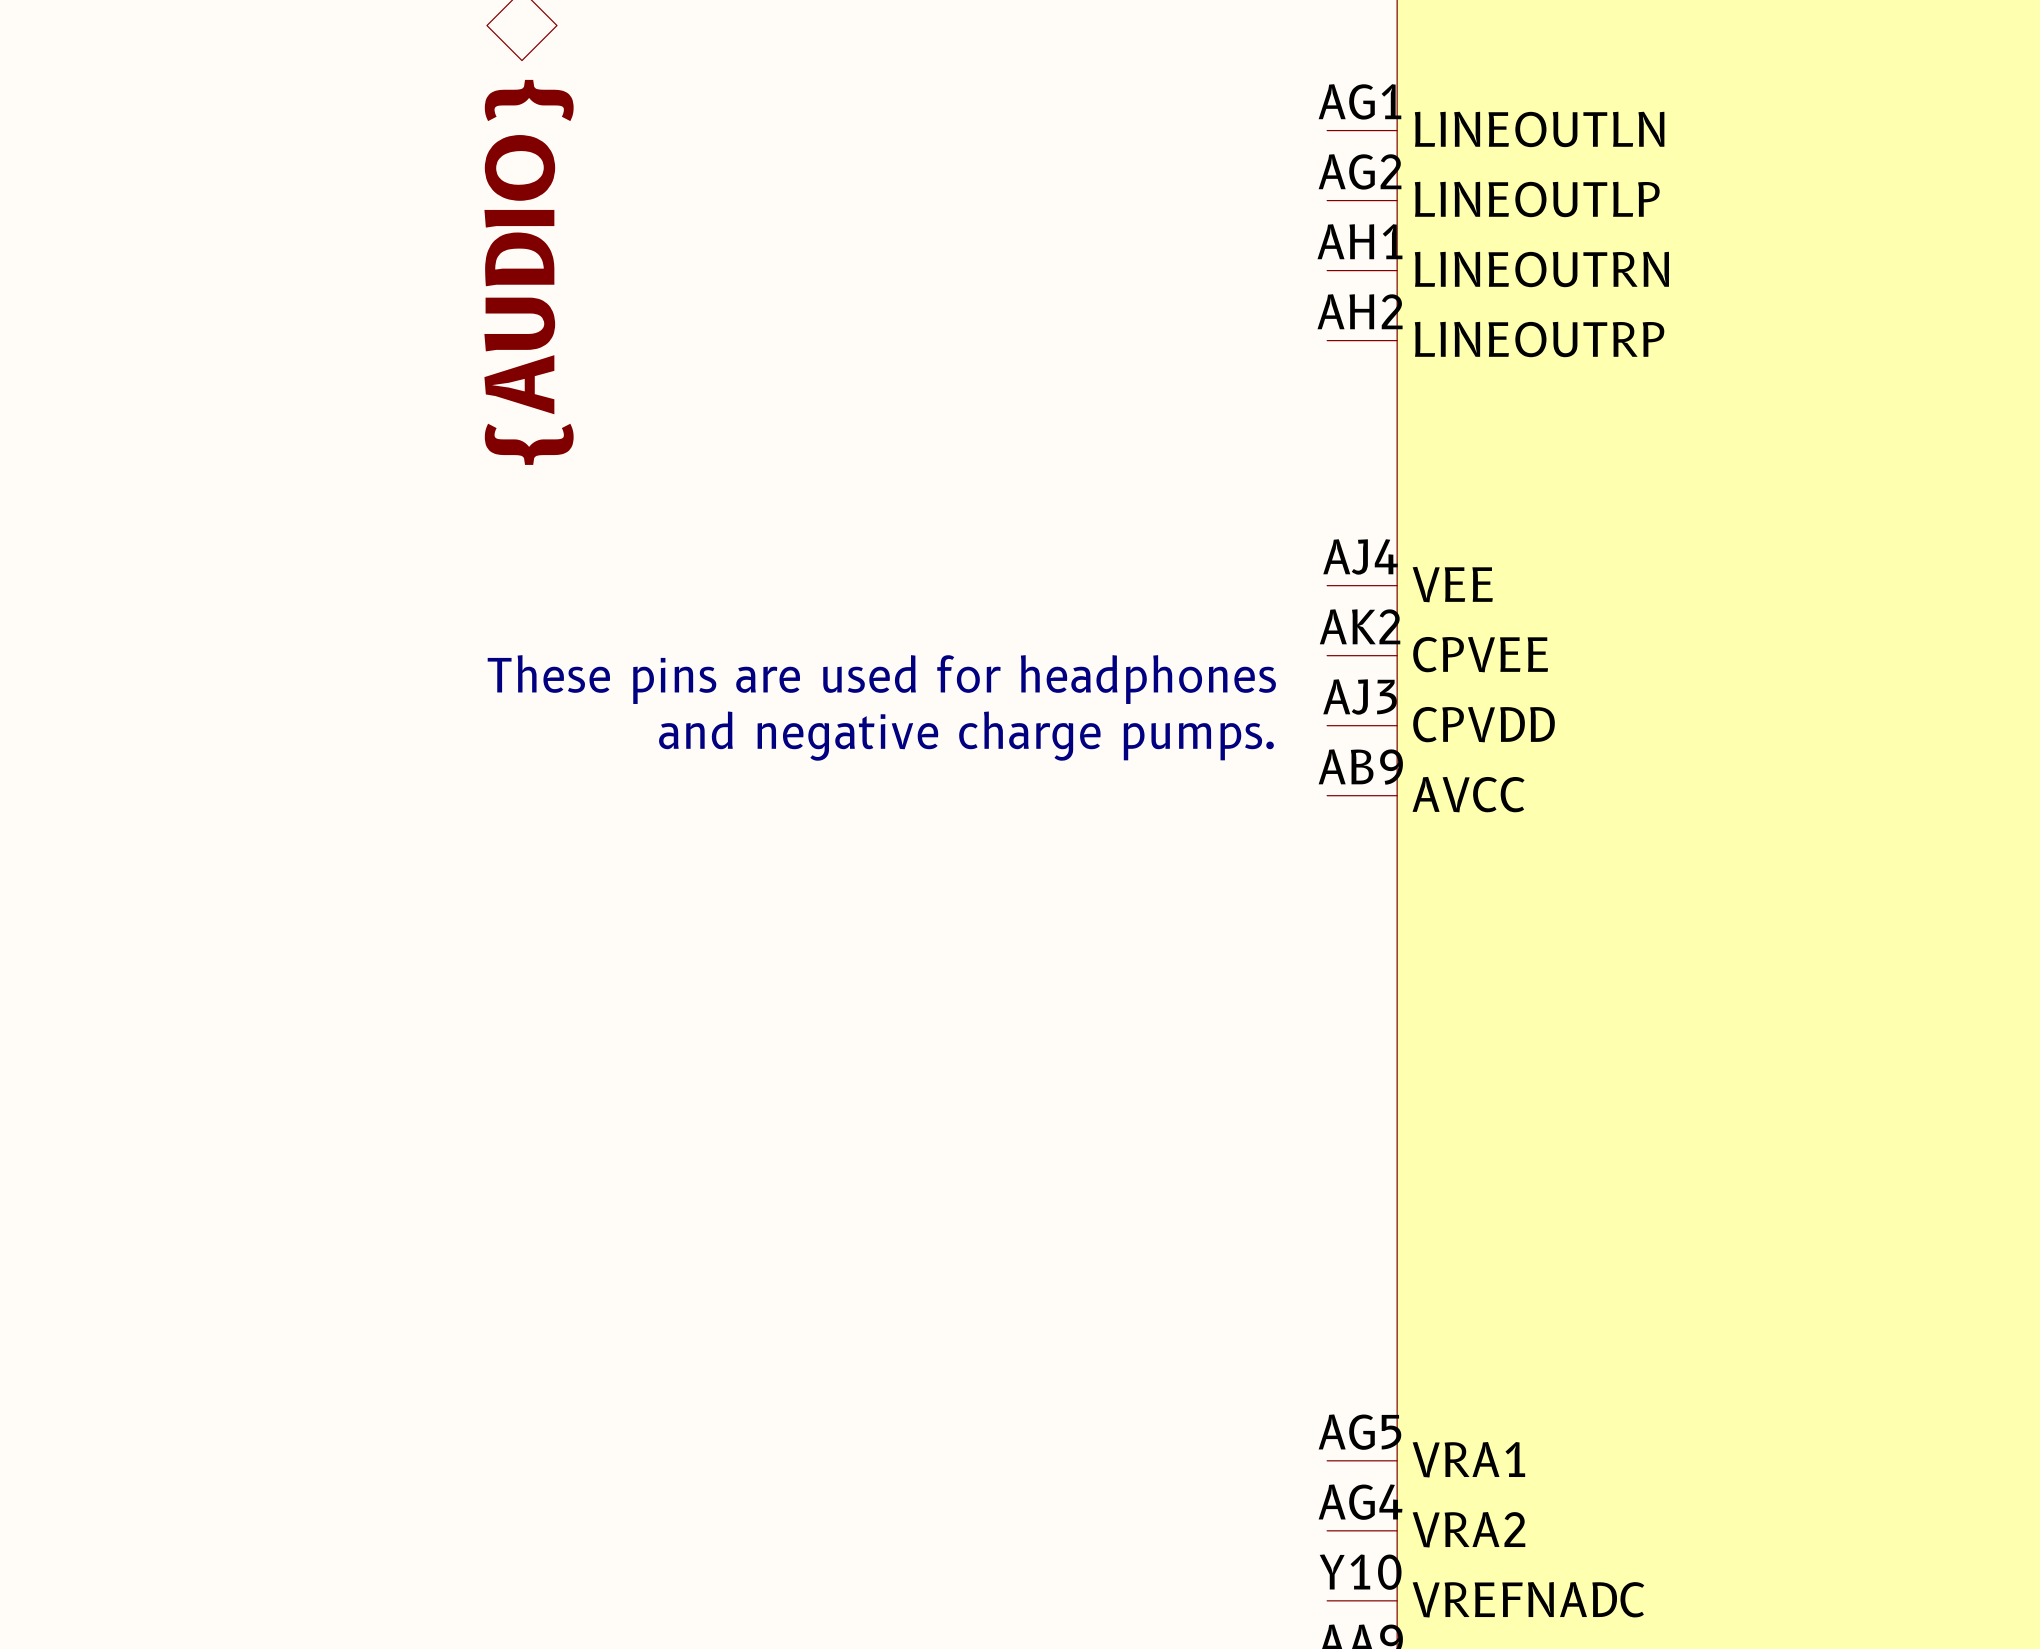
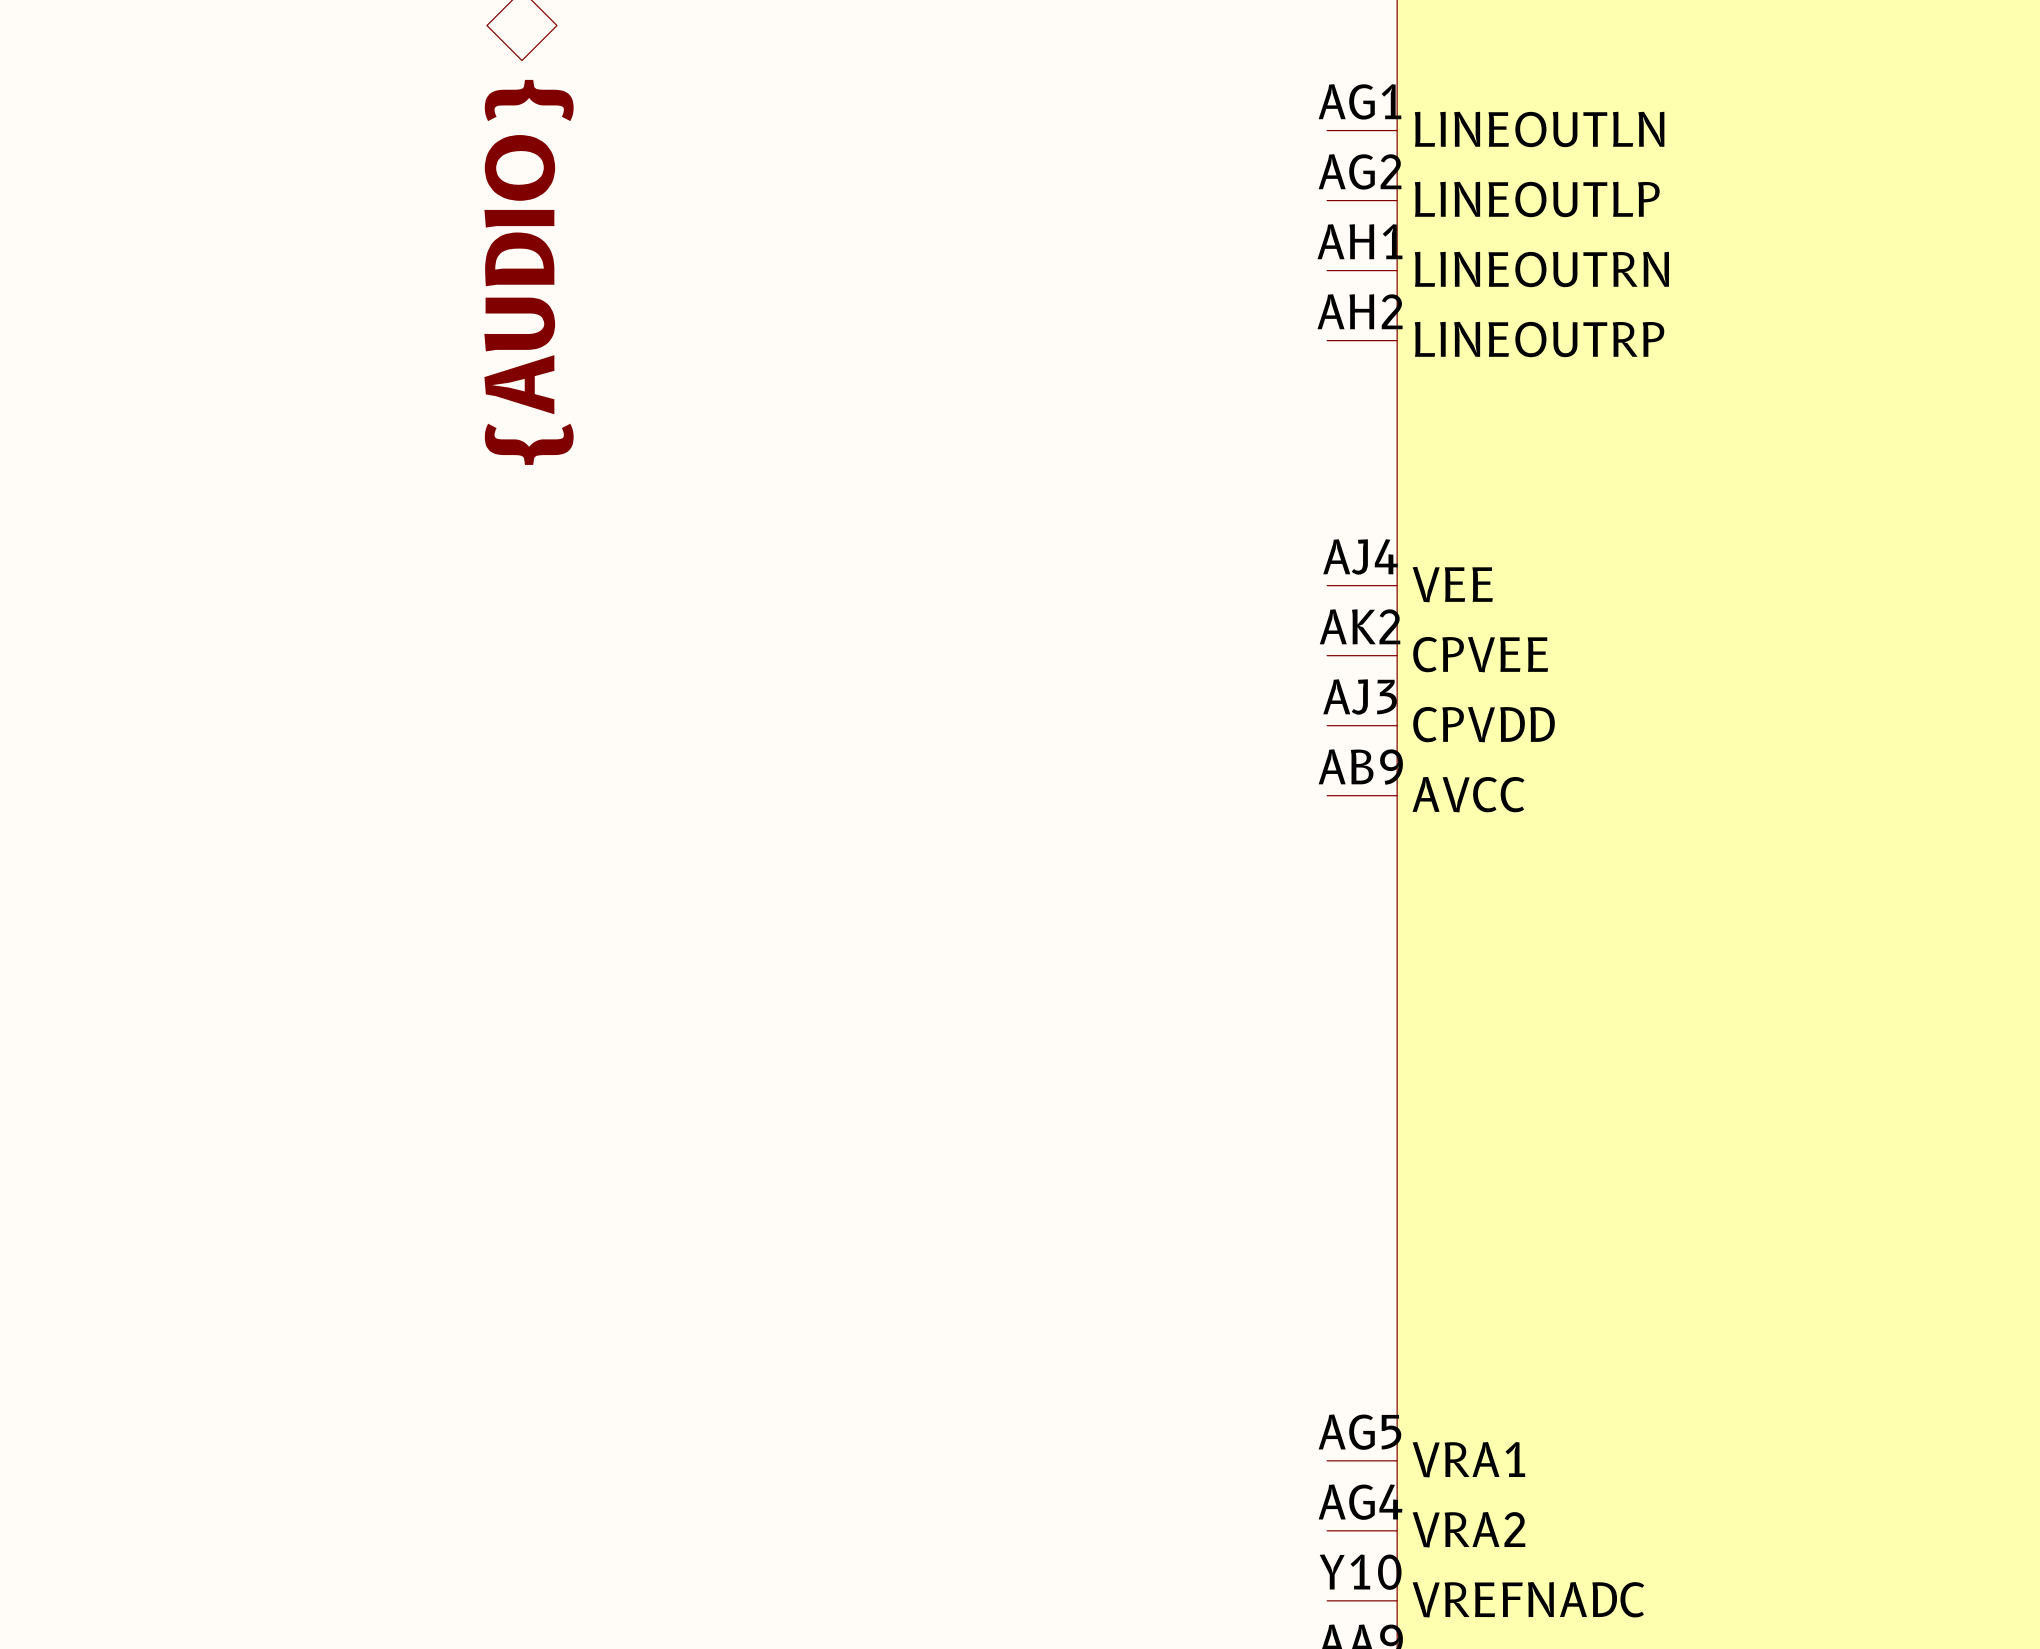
text: These pins are used for headphones (881, 679) -> none
text: and negative charge pumps. (966, 736) -> none

